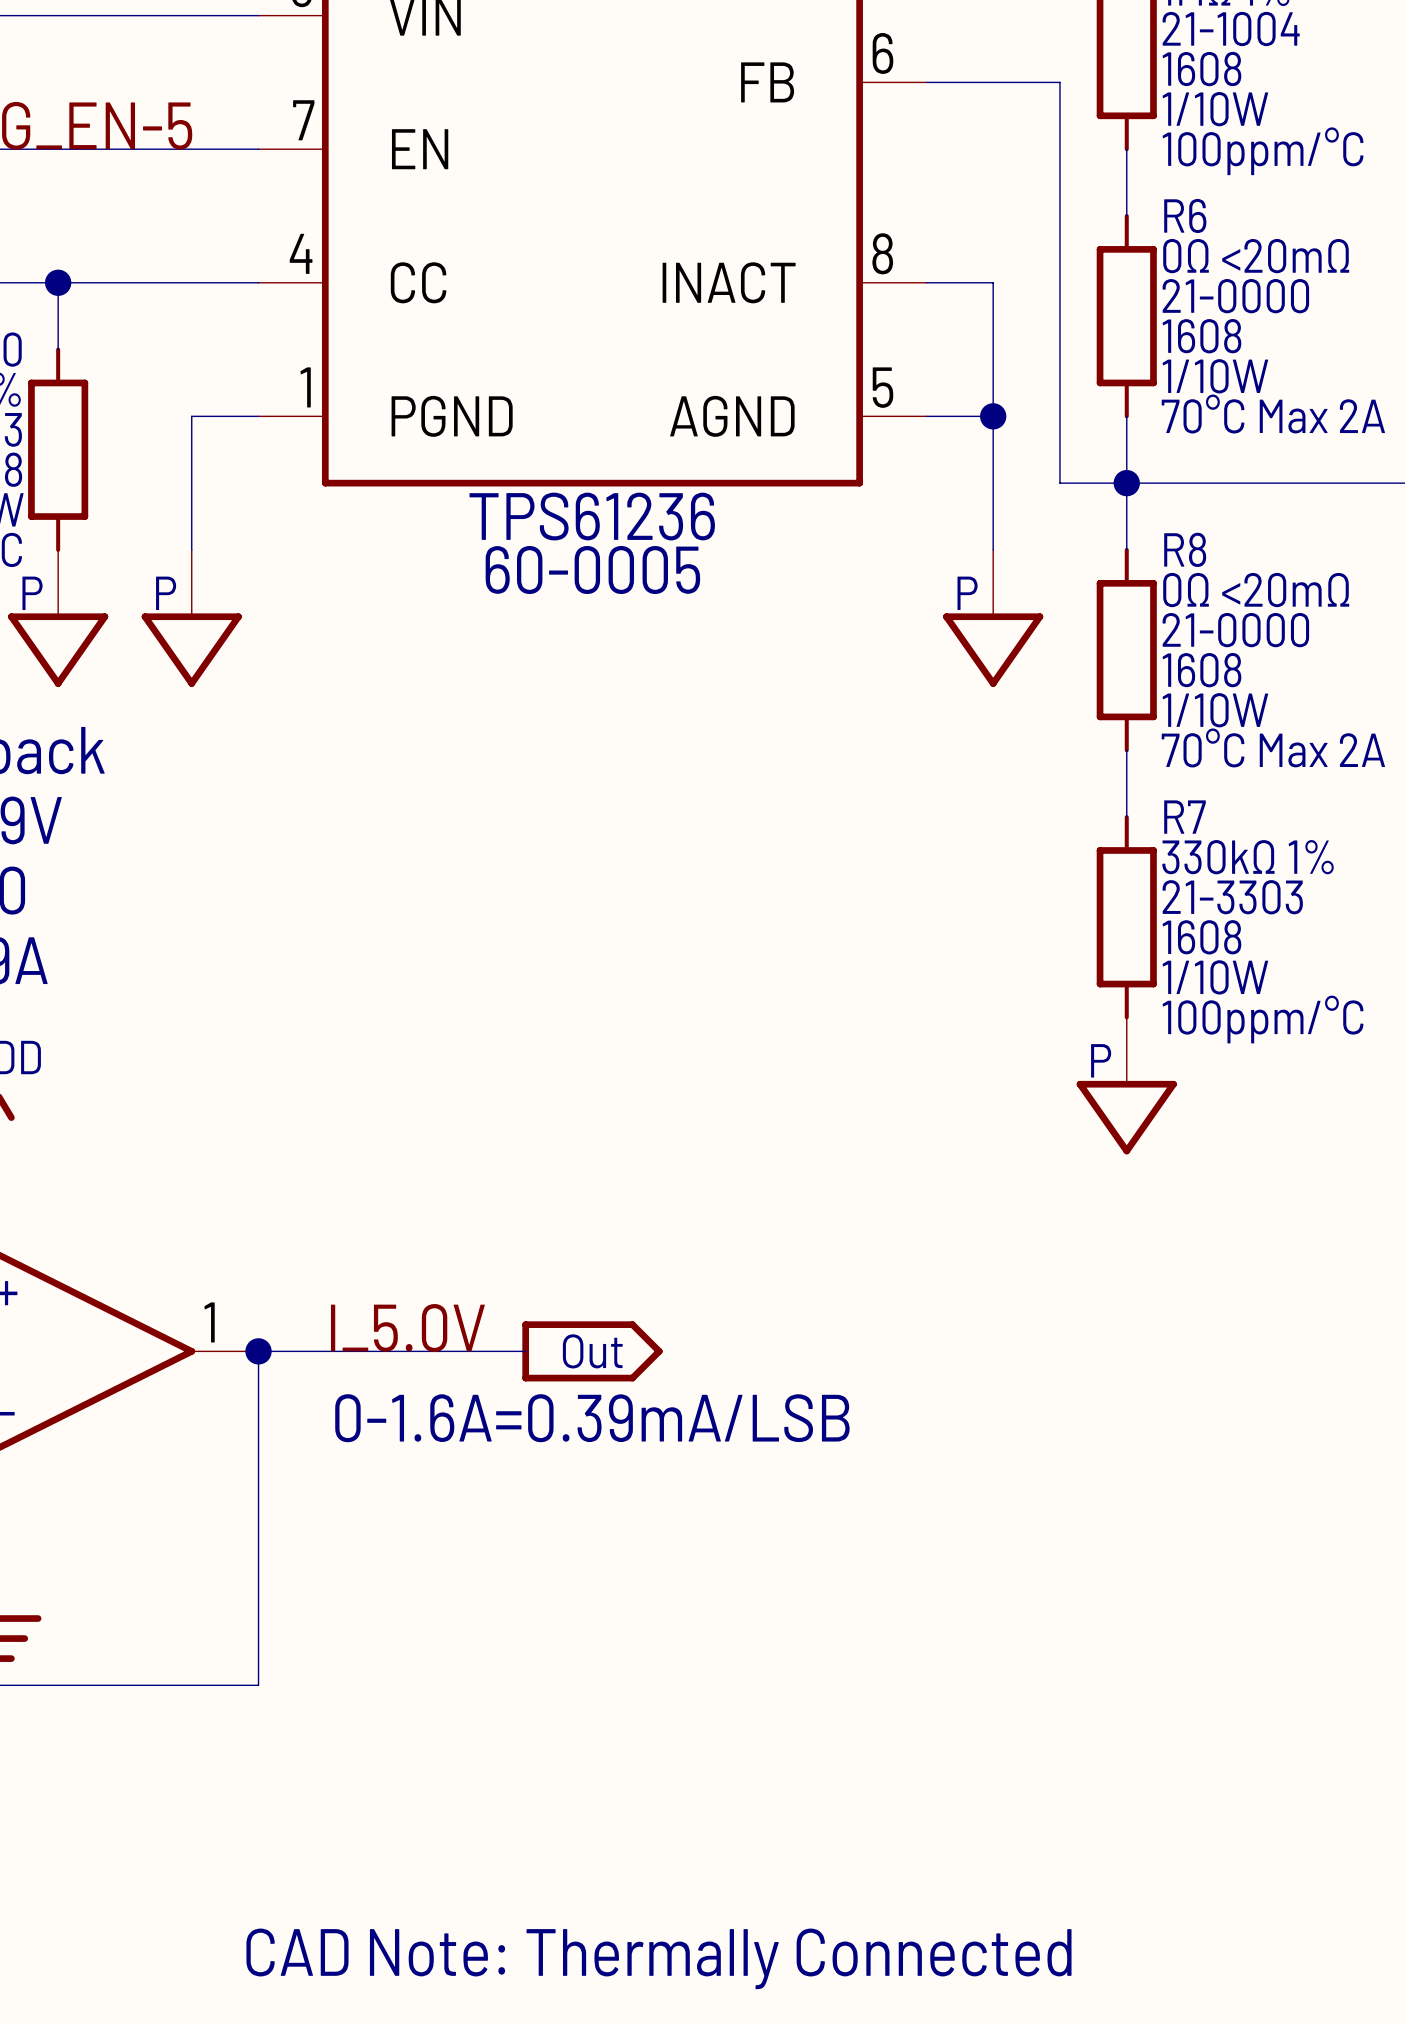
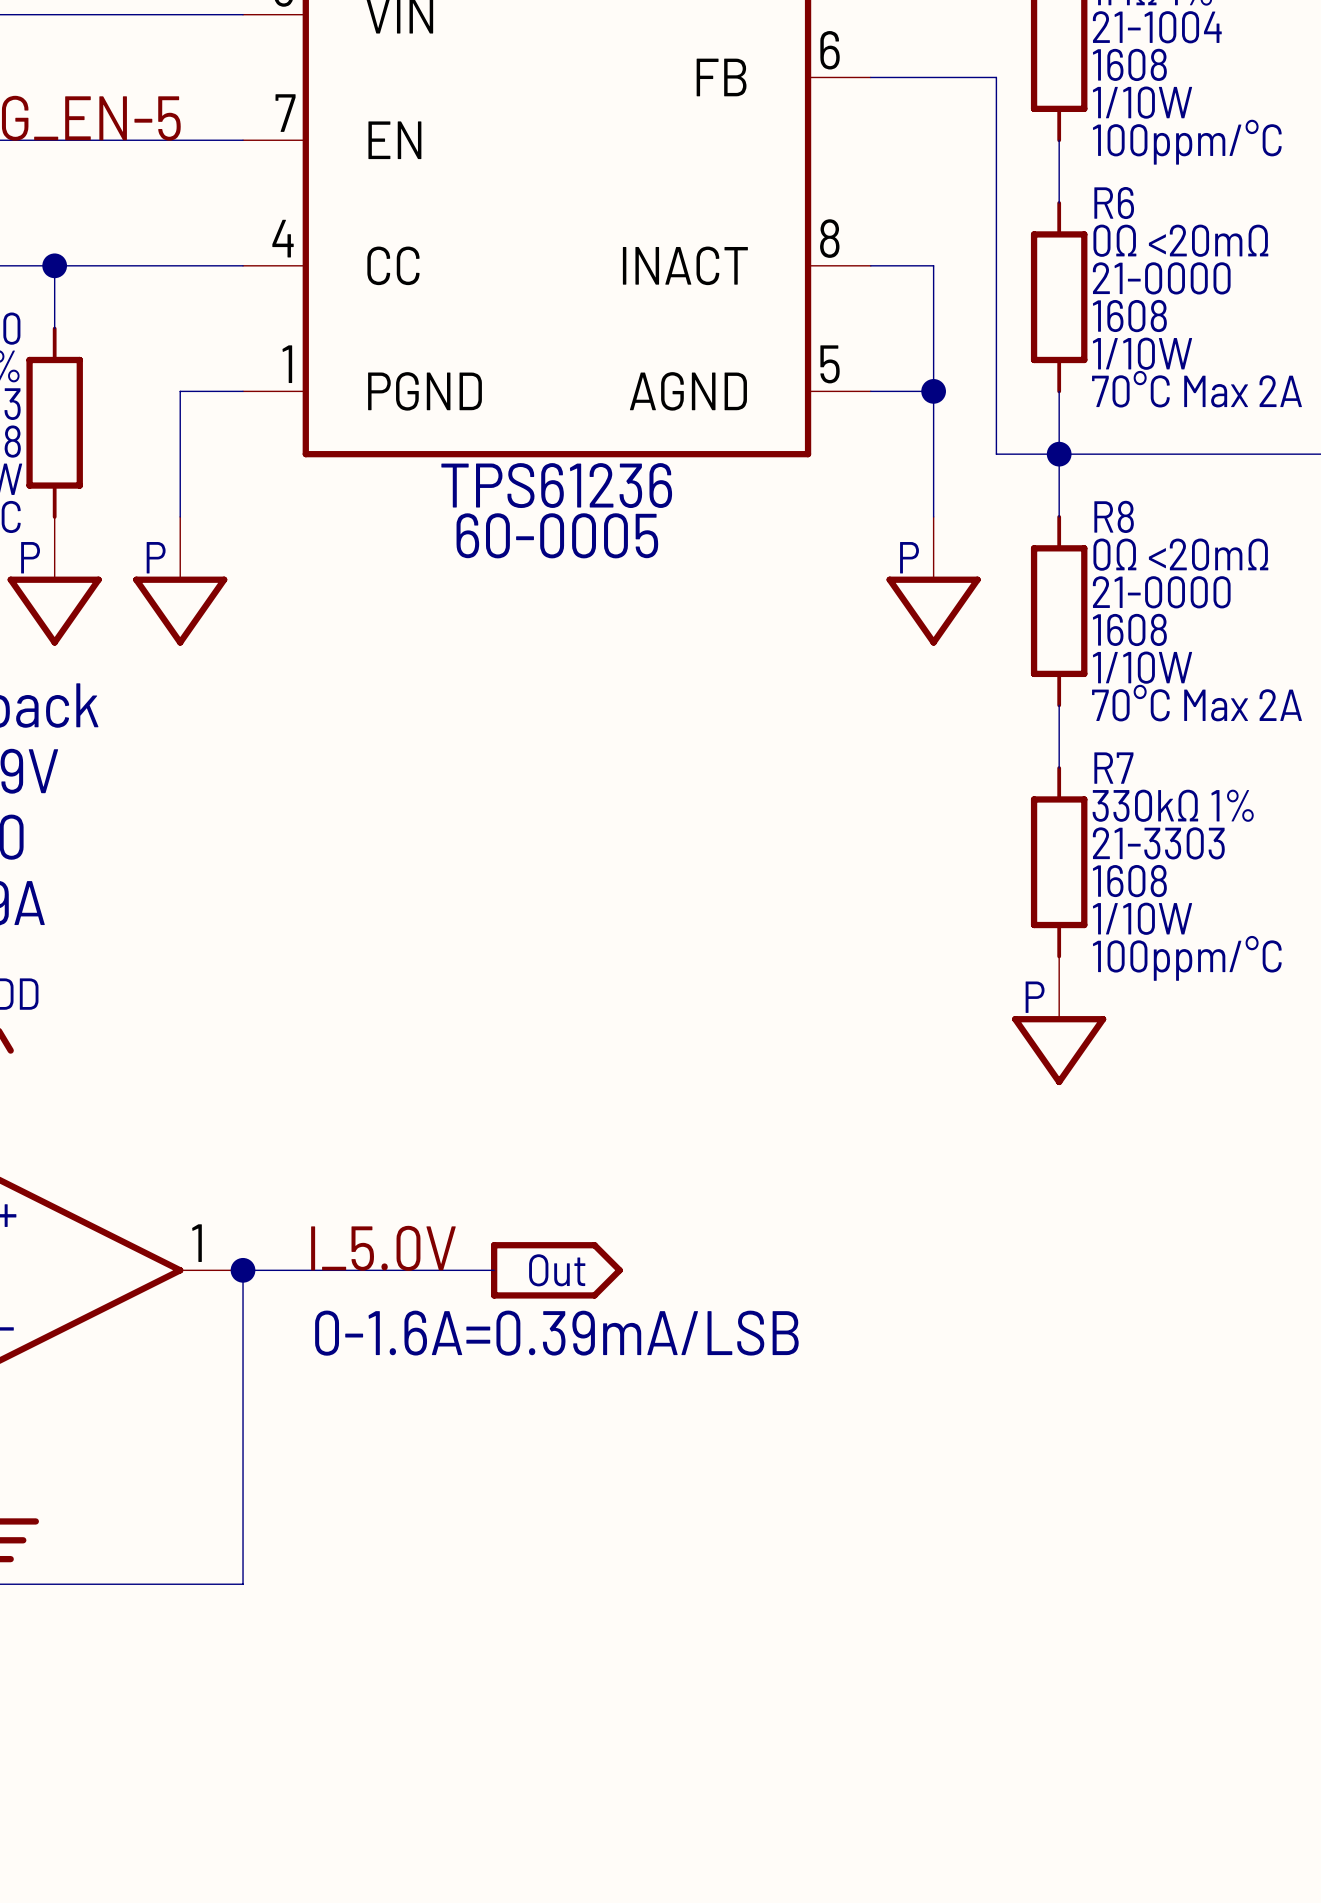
text: CAD Note: Thermally Connected (658, 1958) -> none

